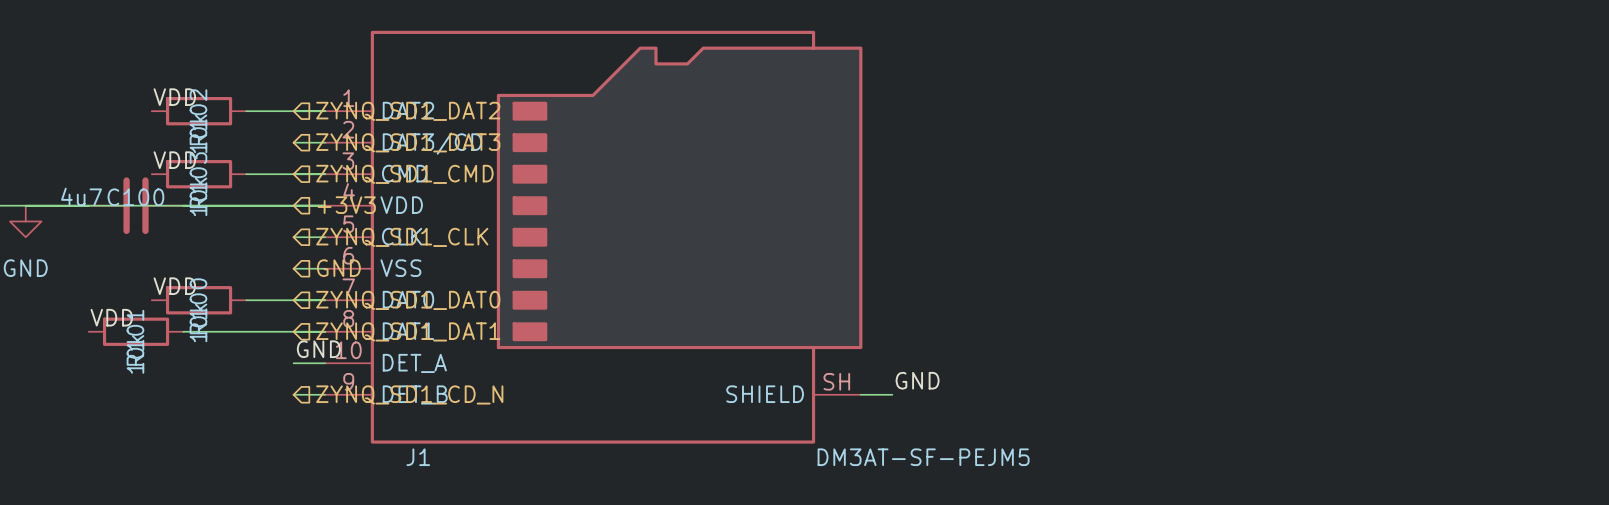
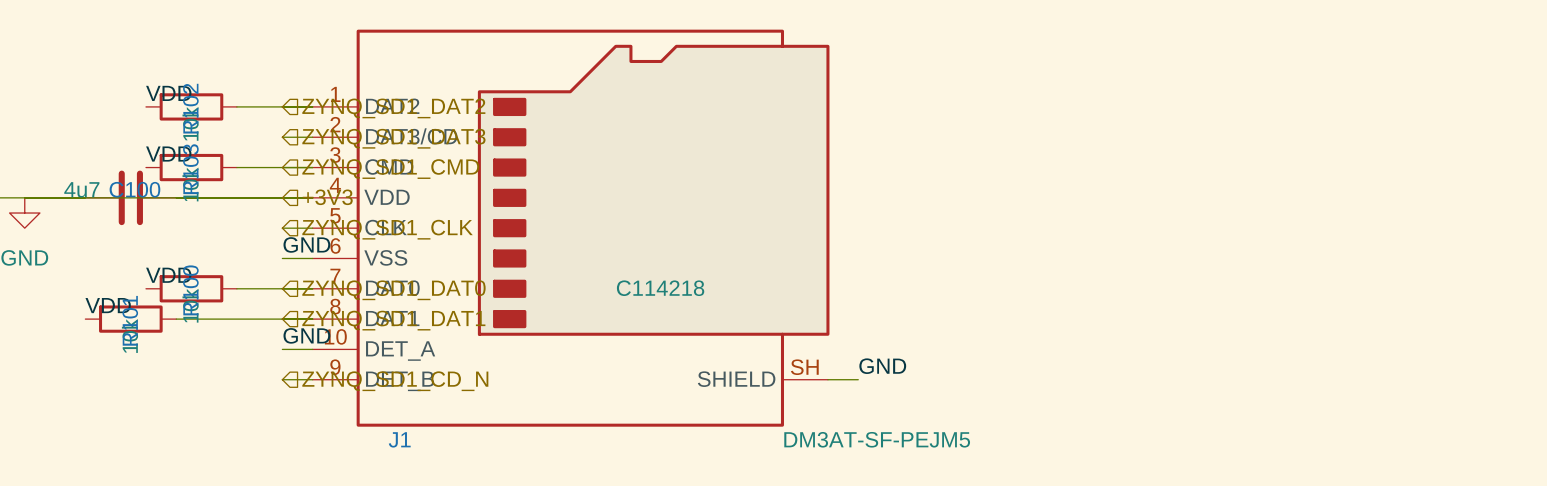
label: none -> GND (306, 244)
hierarchical label: GND (338, 268) -> none
J1 text: none -> C114218 (660, 288)

